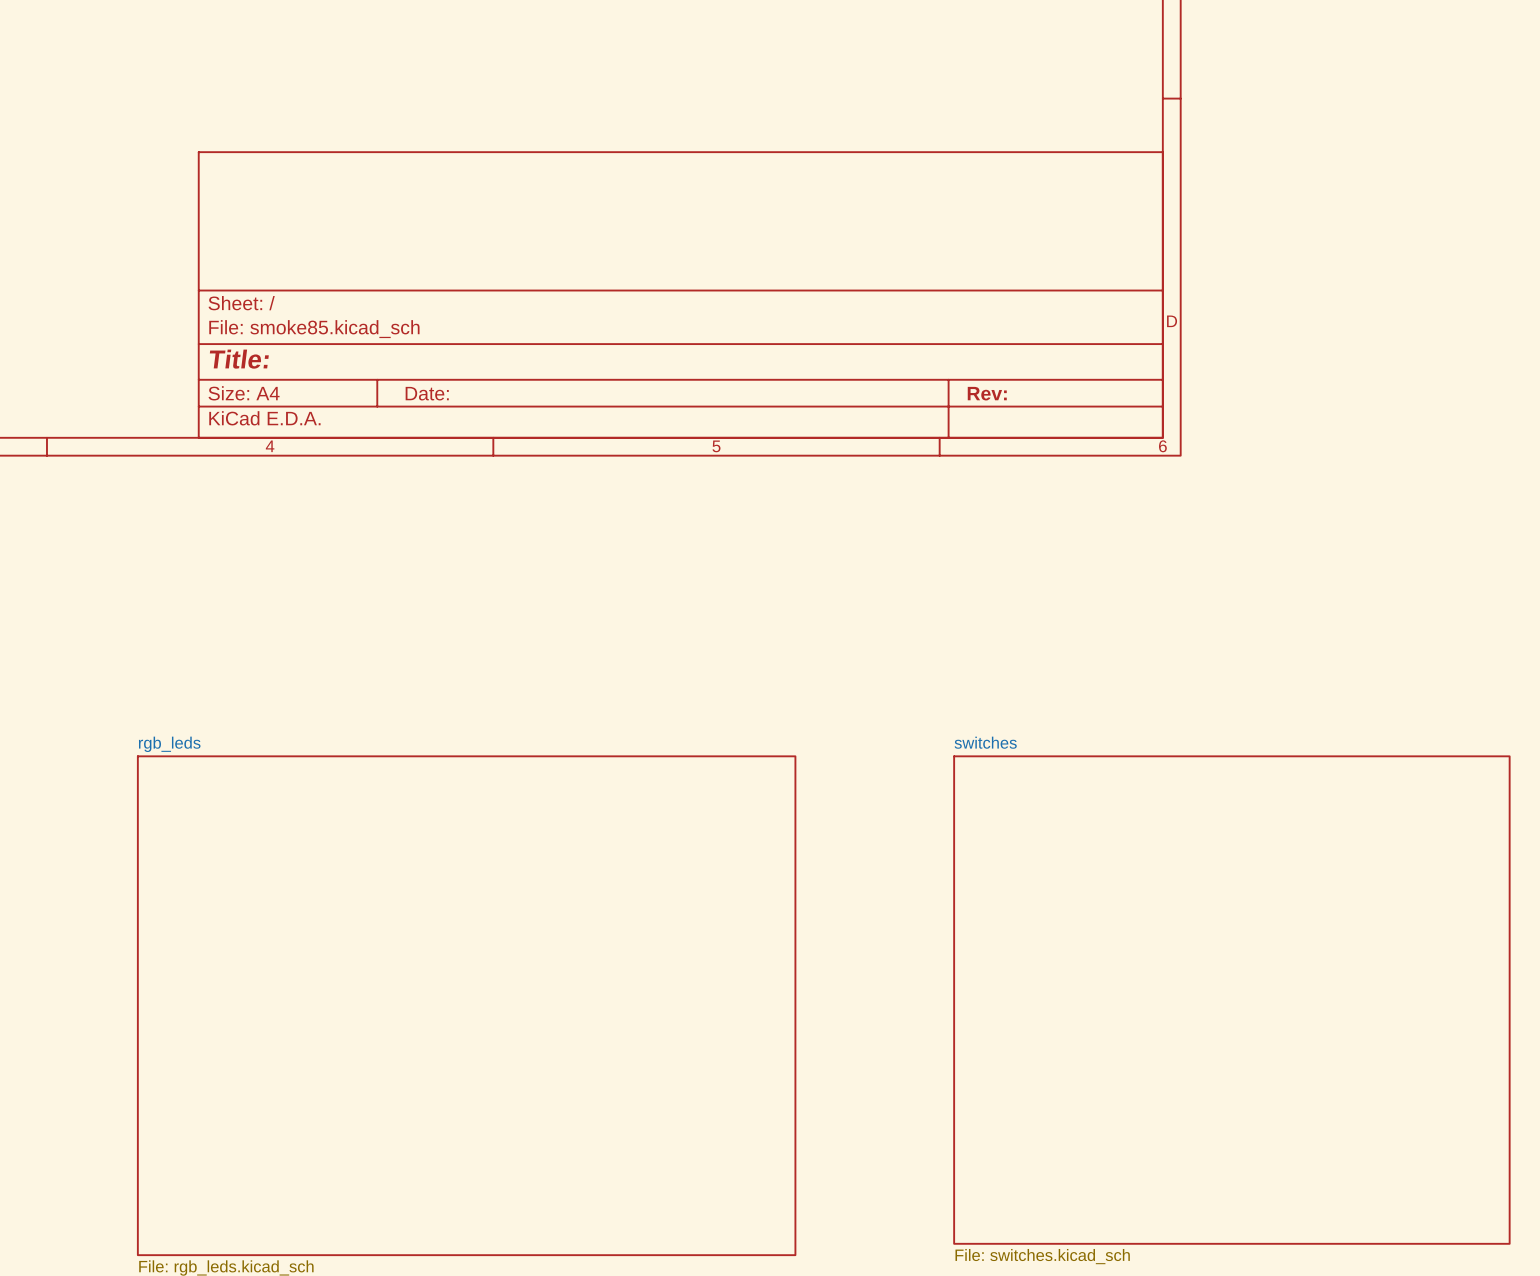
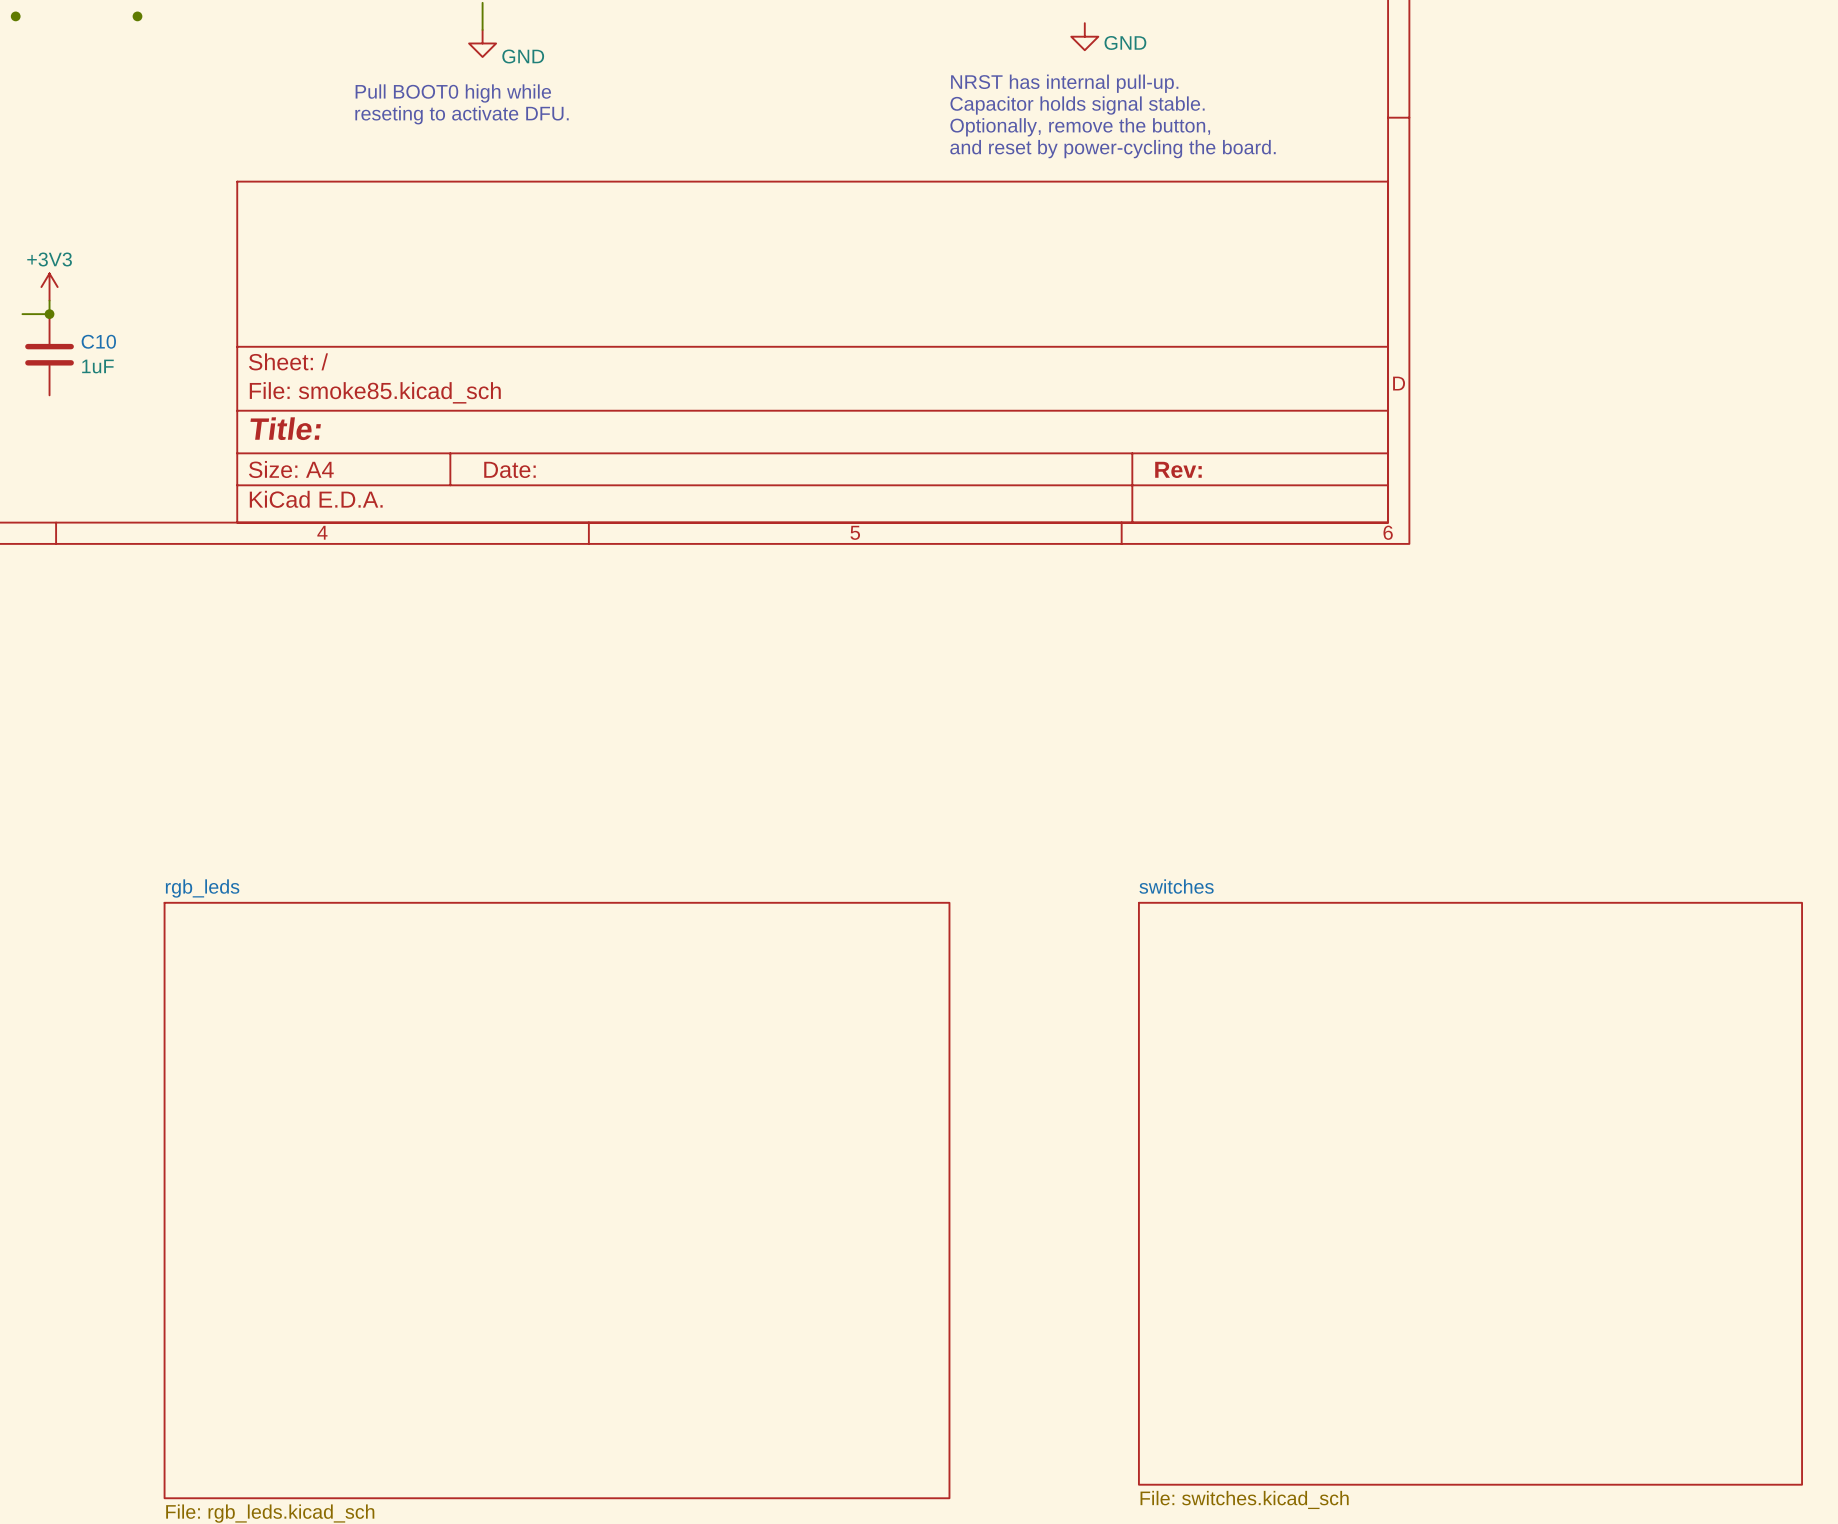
wire: none -> (482, 2) (482, 29)
junction: none -> (15, 16)
junction: none -> (137, 16)
power symbol: none -> GND (1084, 36)
power symbol: none -> GND (482, 43)
text: none -> NRST has internal pull-up. (1064, 83)
text: none -> Pull BOOT0 high while (453, 93)
text: none -> Capacitor holds signal stable. (1077, 105)
text: none -> reseting to activate DFU. (462, 115)
text: none -> Optionally, remove the button, (1080, 127)
text: none -> and reset by power-cycling the board. (1113, 149)
power symbol: none -> +3V3 (49, 287)
wire: none -> (49, 300) (49, 314) (22, 314)
junction: none -> (49, 314)
C10: none -> 1uF (49, 354)

